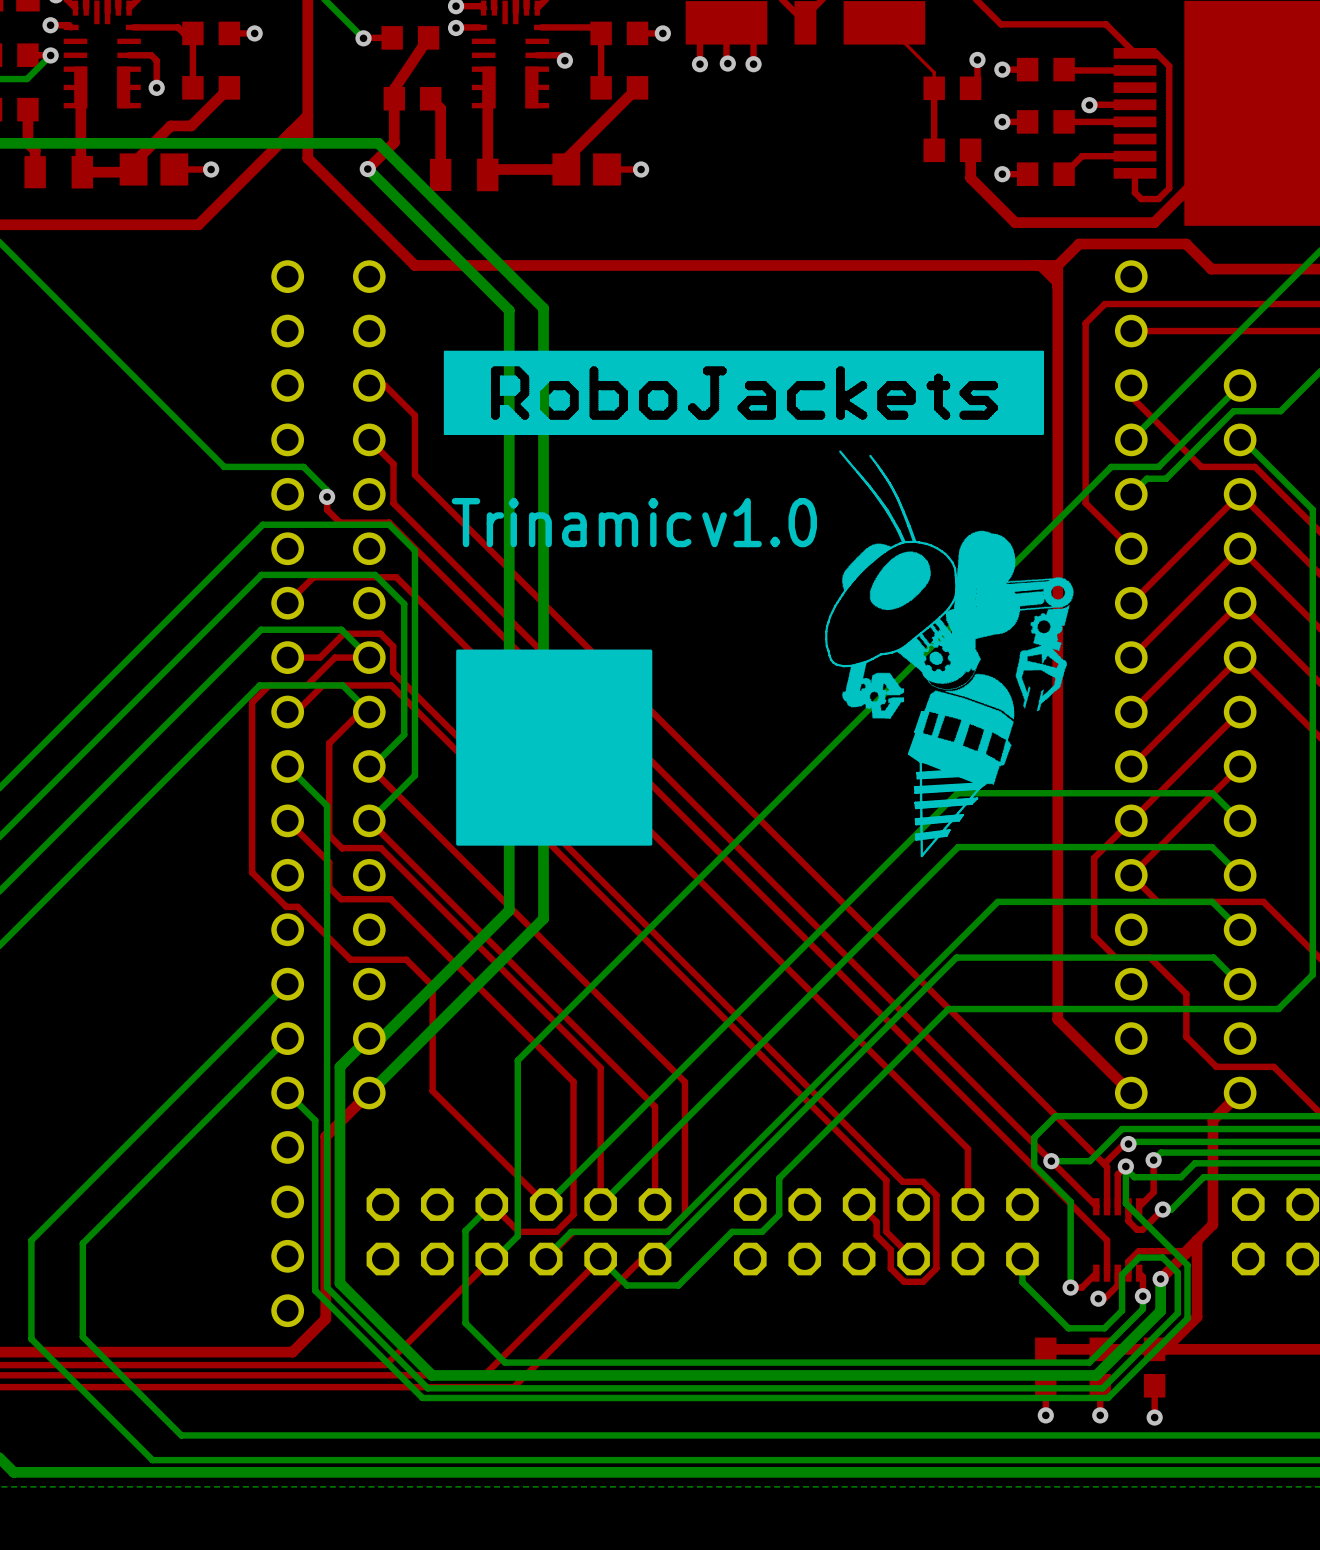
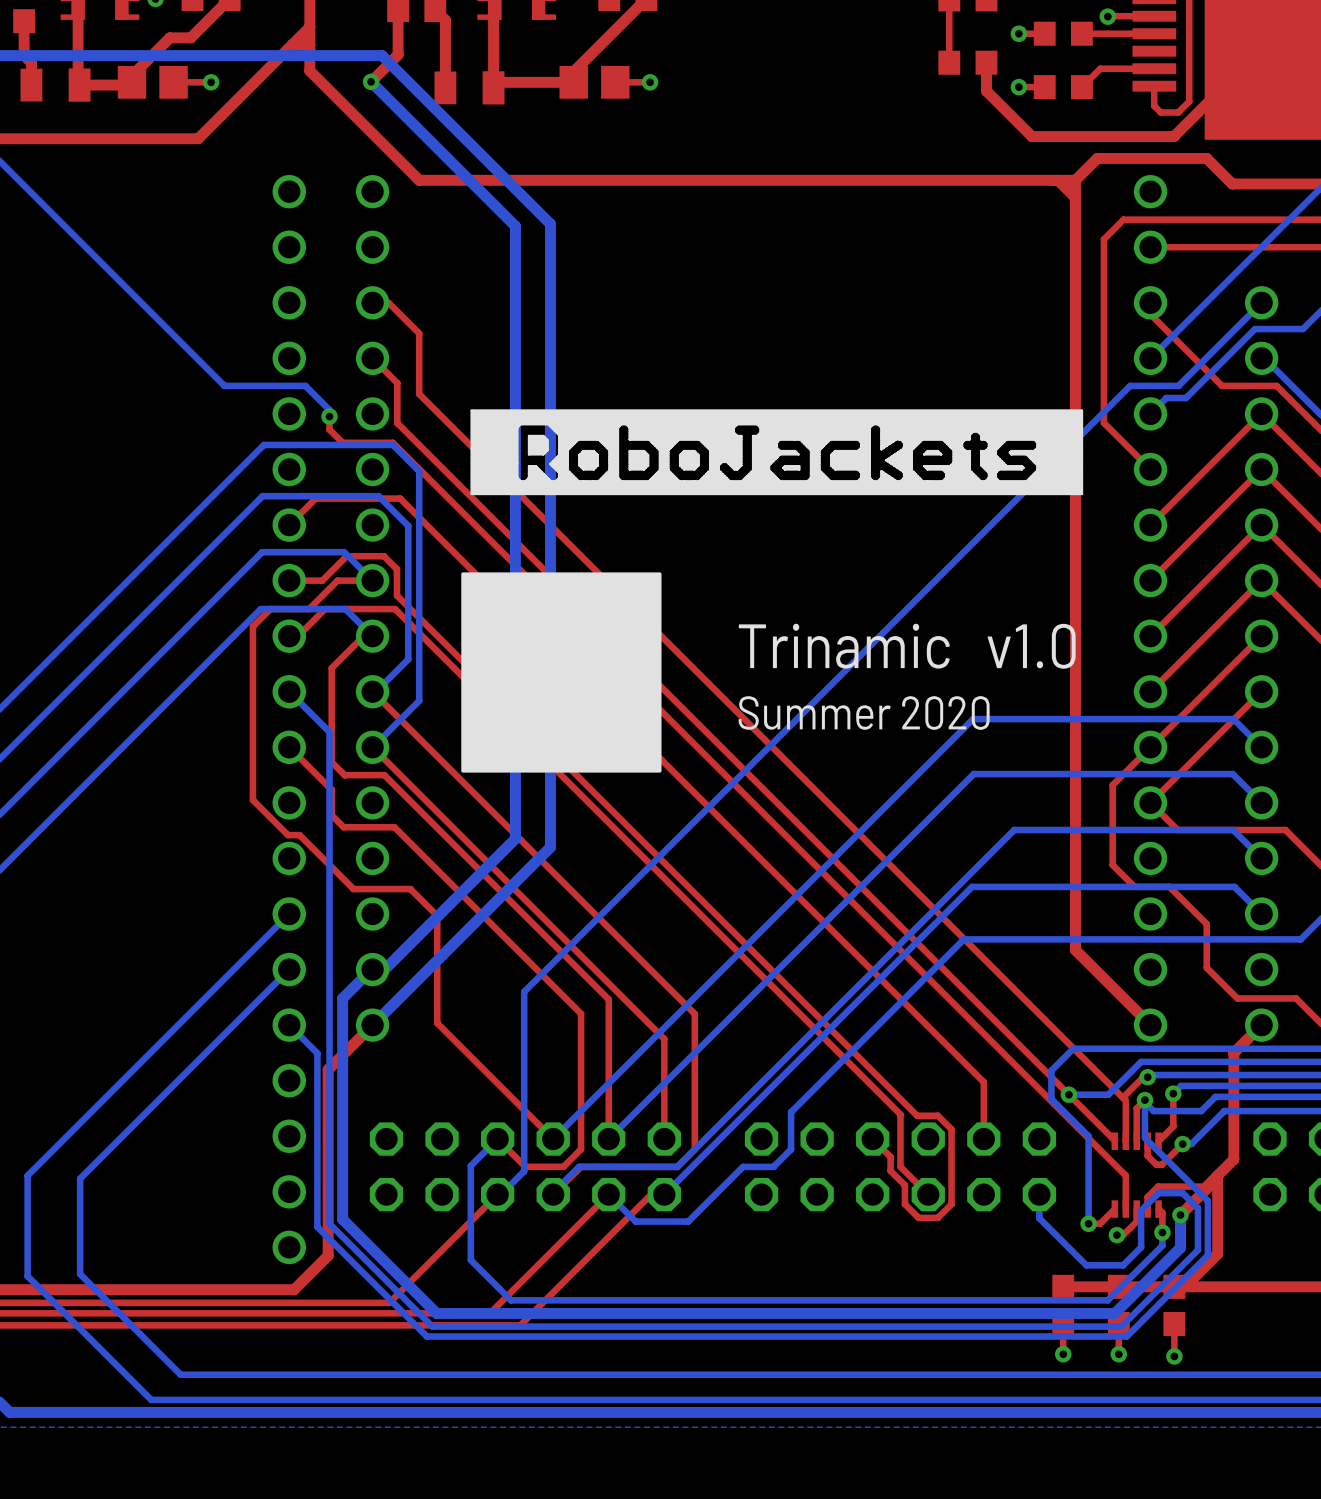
drawing position: (743, 392) -> (776, 452)
drawing: [825, 450, 1074, 858] -> none
text position: Trinamic (571, 522) -> Trinamic (844, 646)
text position: v1.0 (759, 522) -> v1.0 (1031, 646)
text: none -> Summer 2020 (864, 712)

